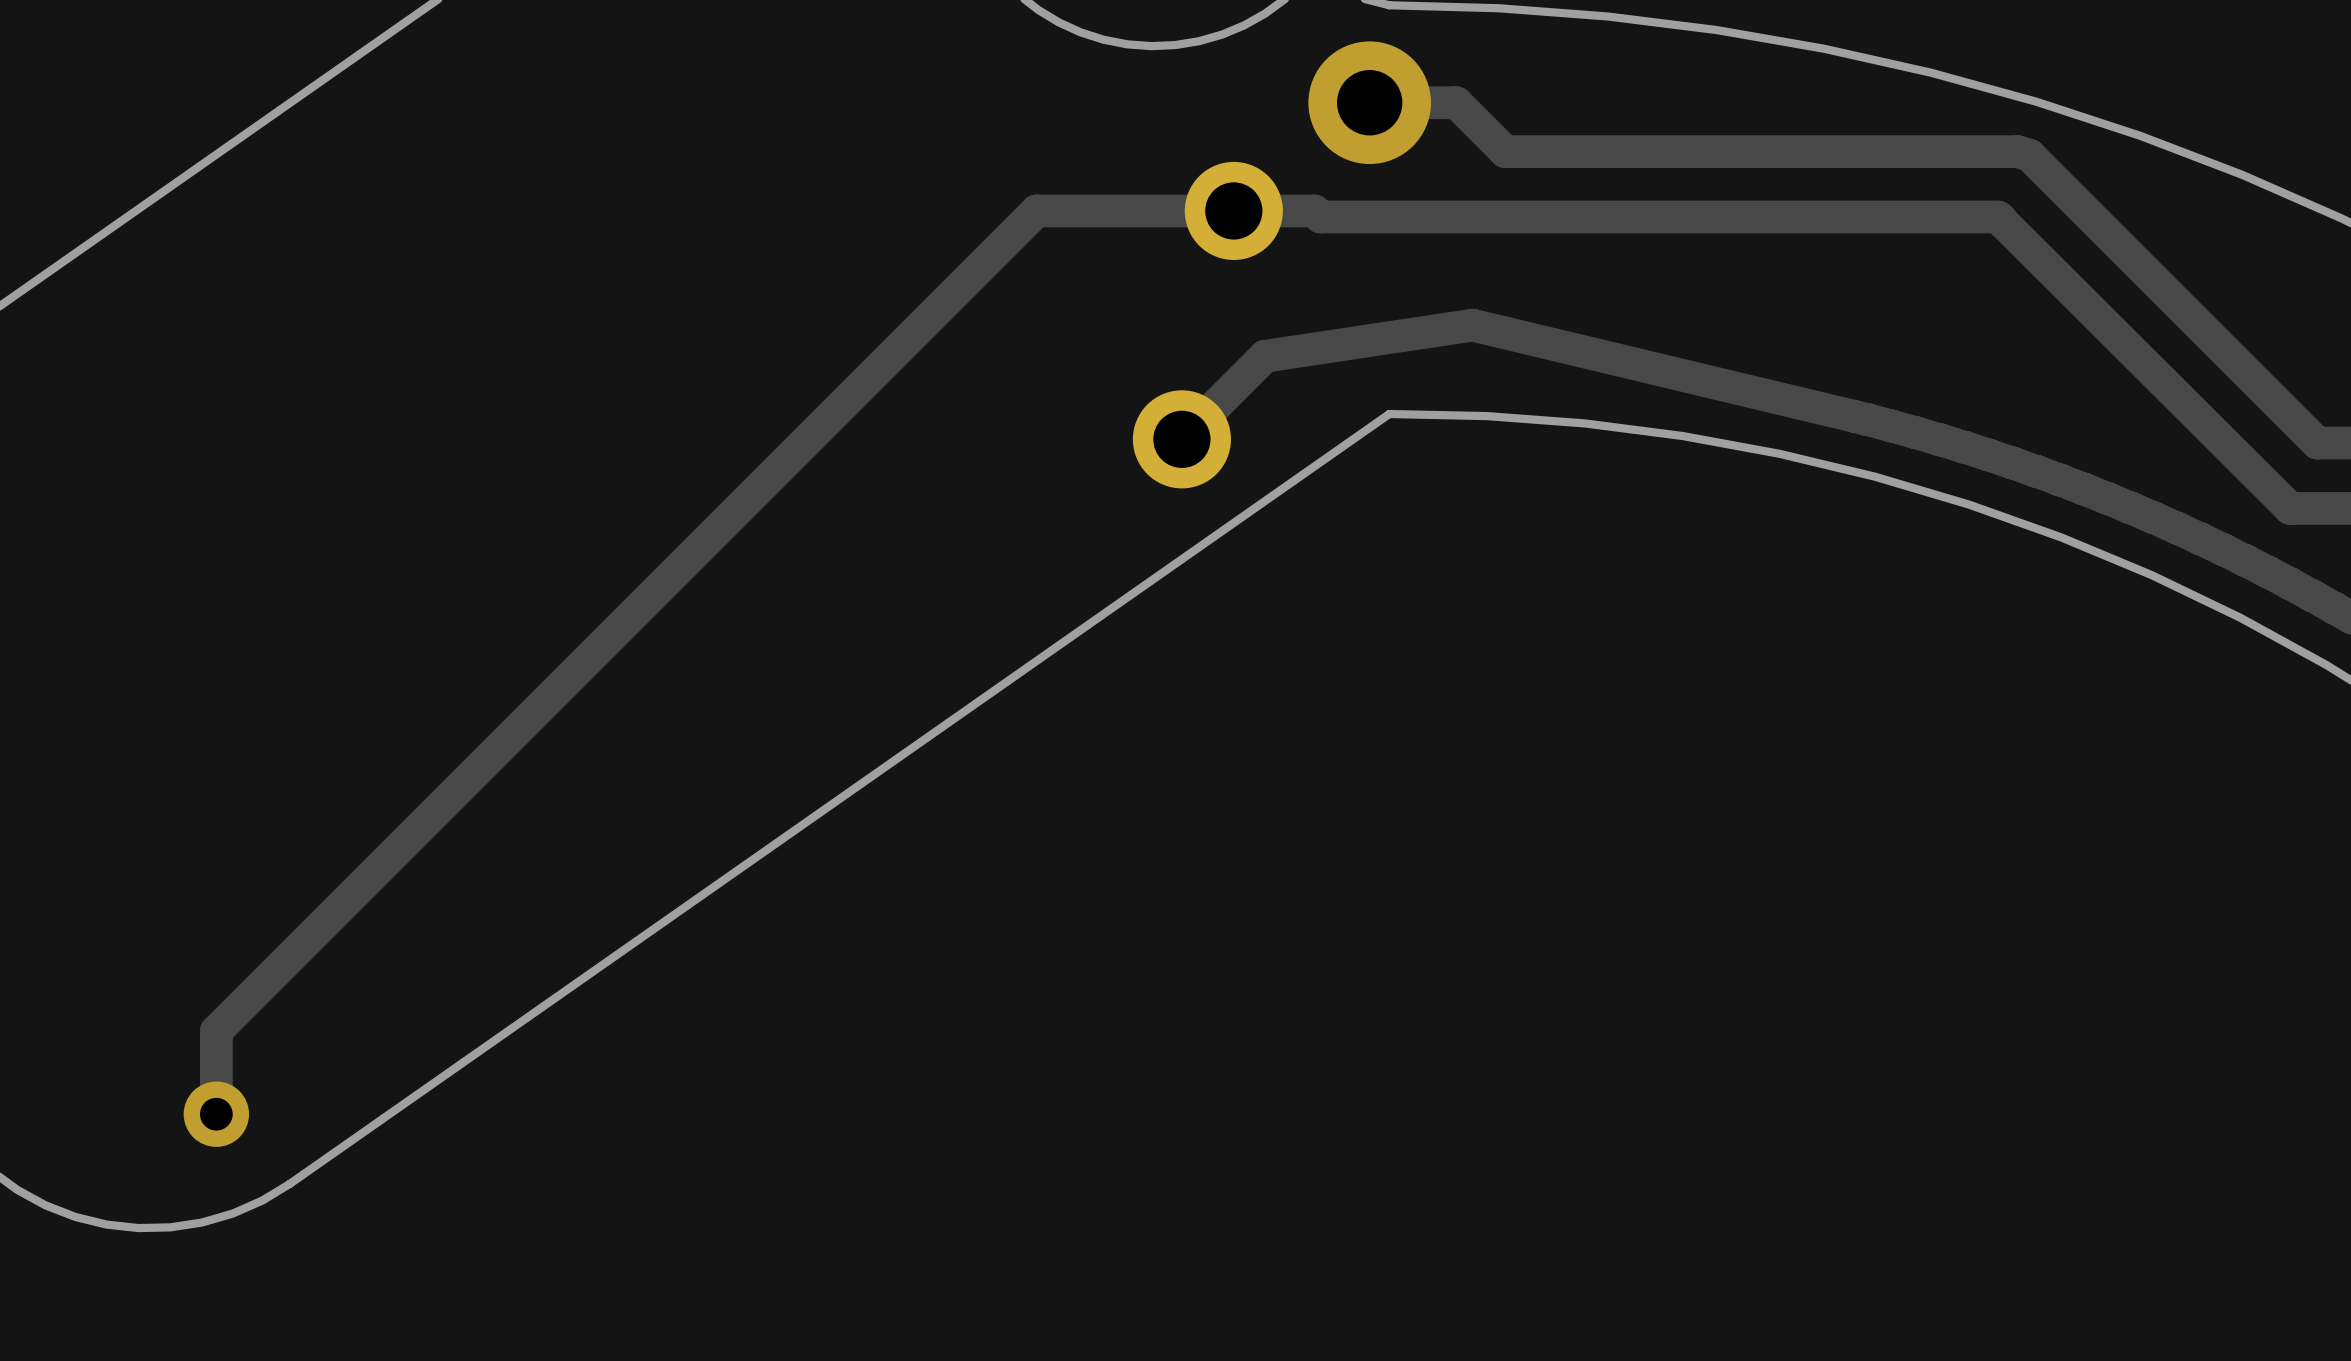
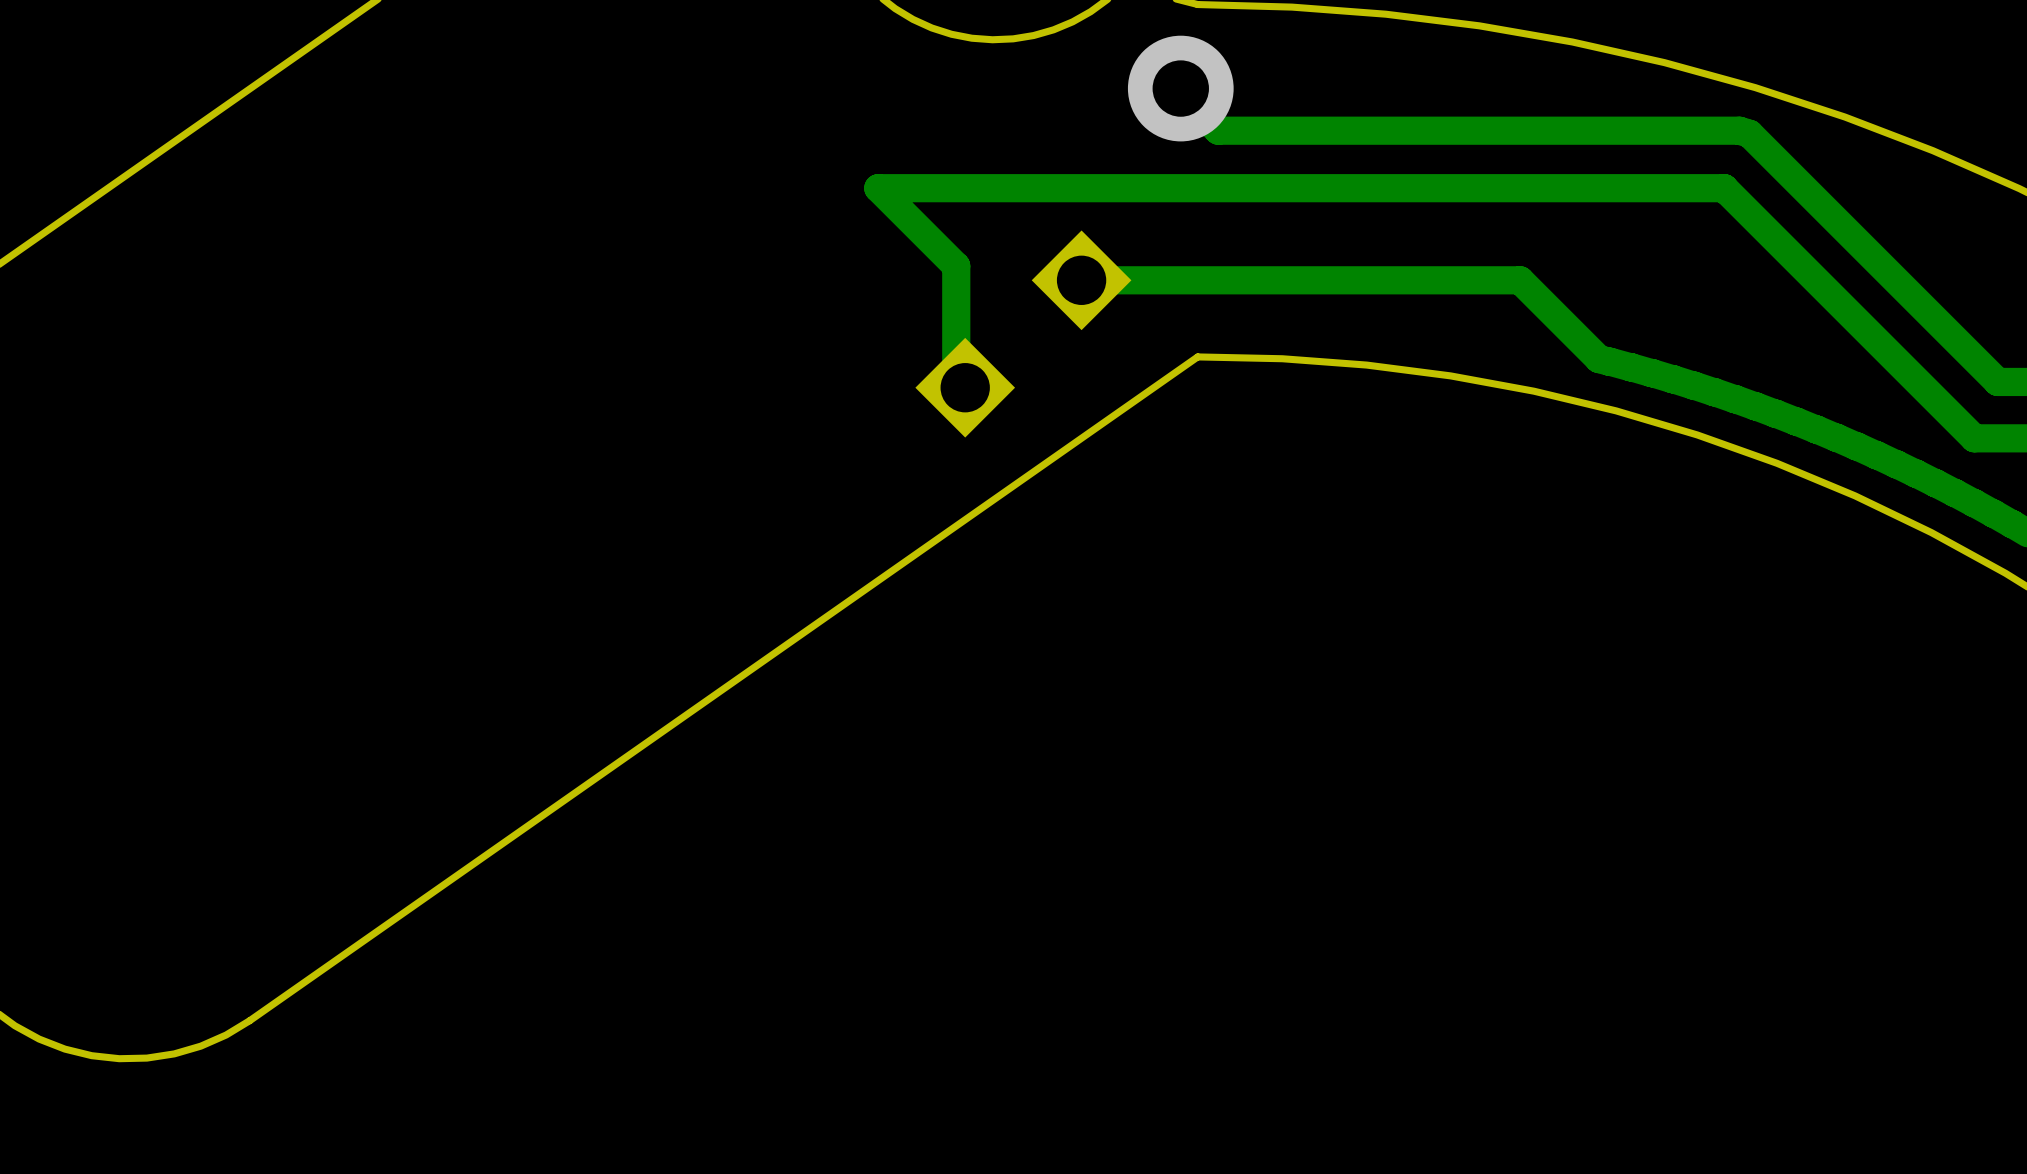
track: (1369, 102) (1456, 102) (1505, 151) -> (1180, 92) (1218, 130) (1297, 130)
part: (1233, 210) -> none
part: none -> (1081, 280)
part footprint: [1132, 390, 1231, 489] -> [915, 337, 1016, 438]
track: (1854, 416) (1472, 325) (1264, 356) (1181, 439) -> (1598, 359) (1520, 280) (1081, 280)
track: (2290, 508) (1997, 217) (1320, 217) (1314, 210) (1036, 210) (216, 1031) (216, 1114) -> (1974, 438) (1724, 188) (878, 188) (956, 266) (956, 378)
via: (216, 1114) -> none

